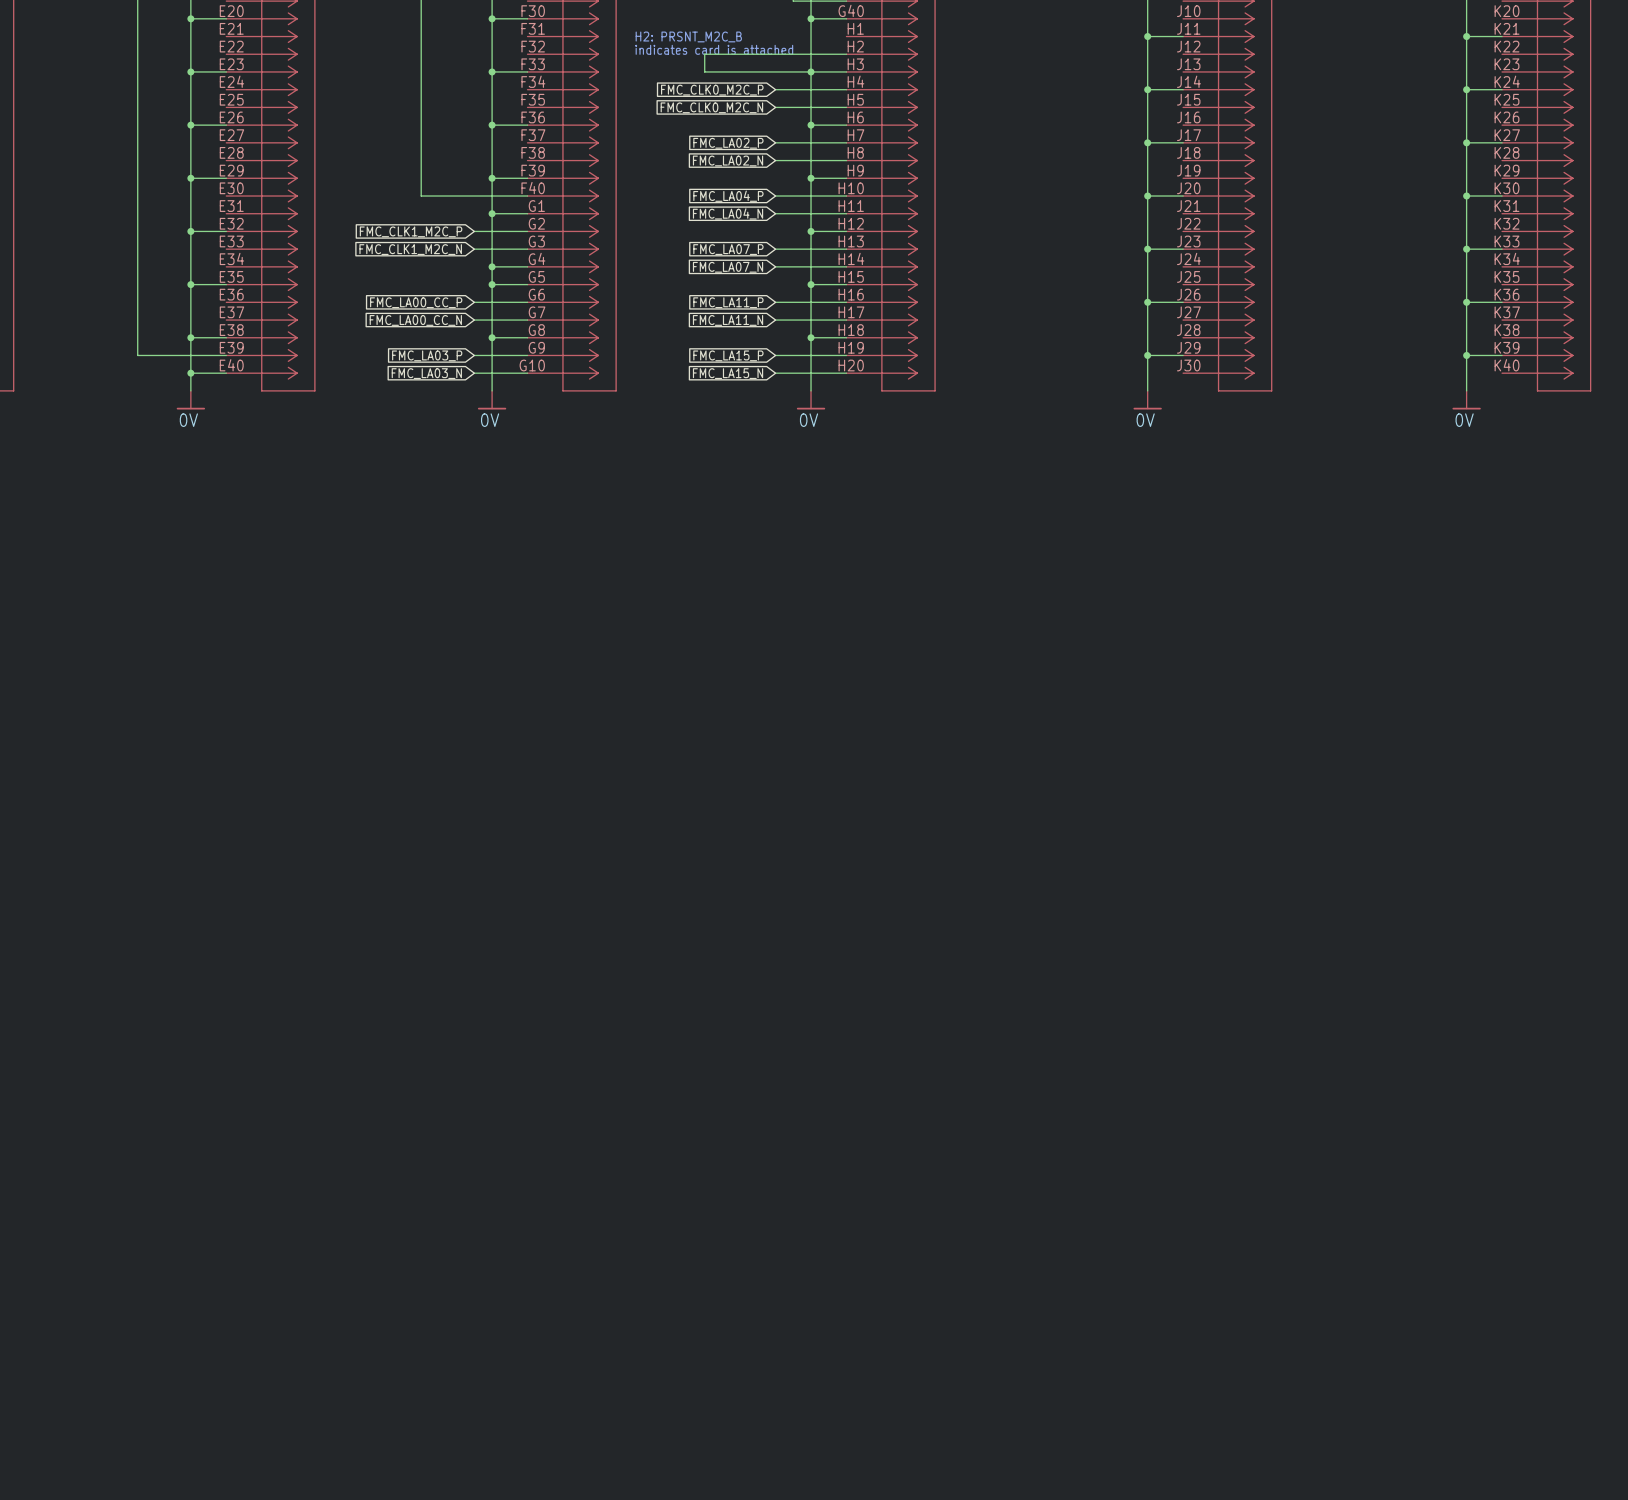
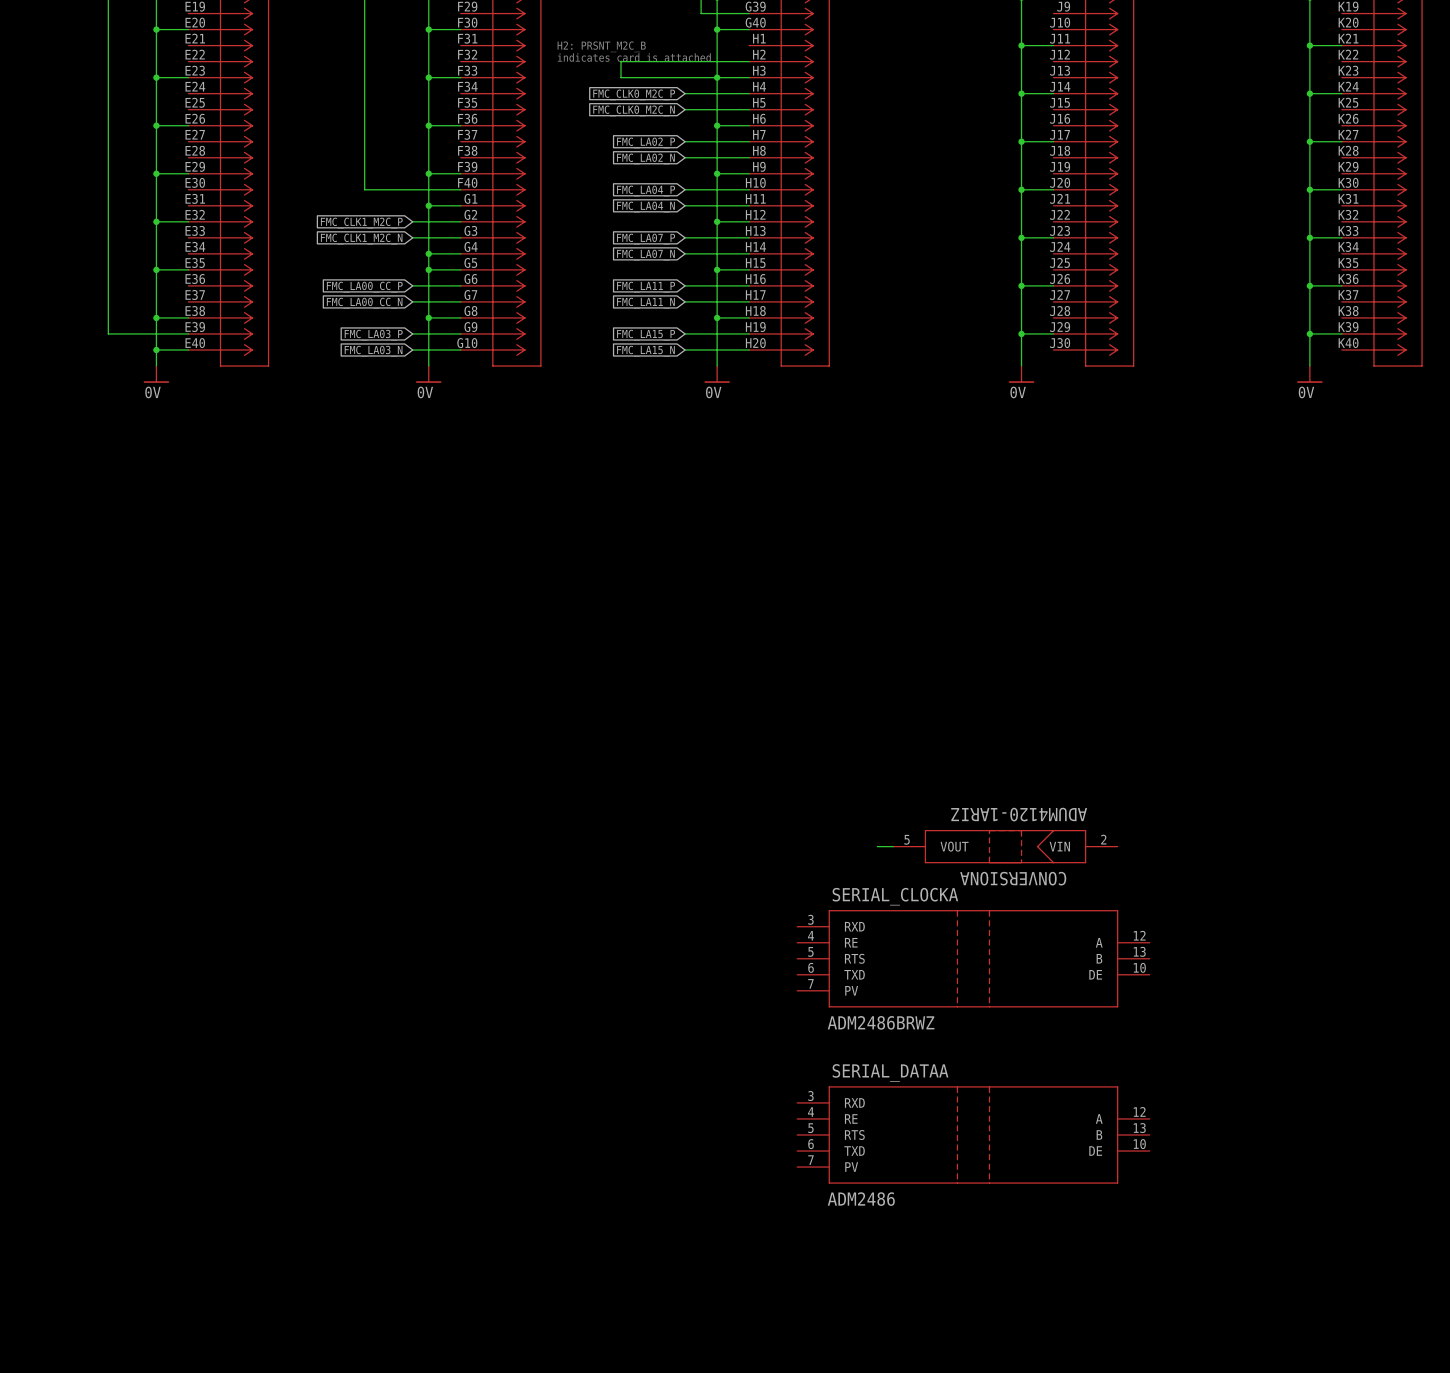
wire: none -> (877, 846) (893, 846)
CONVERSIONA: none -> ADUM4120-1ARIZ (1005, 846)
SERIAL_CLOCKA: none -> ADM2486BRWZ (973, 958)
SERIAL_DATAA: none -> ADM2486 (973, 1134)

